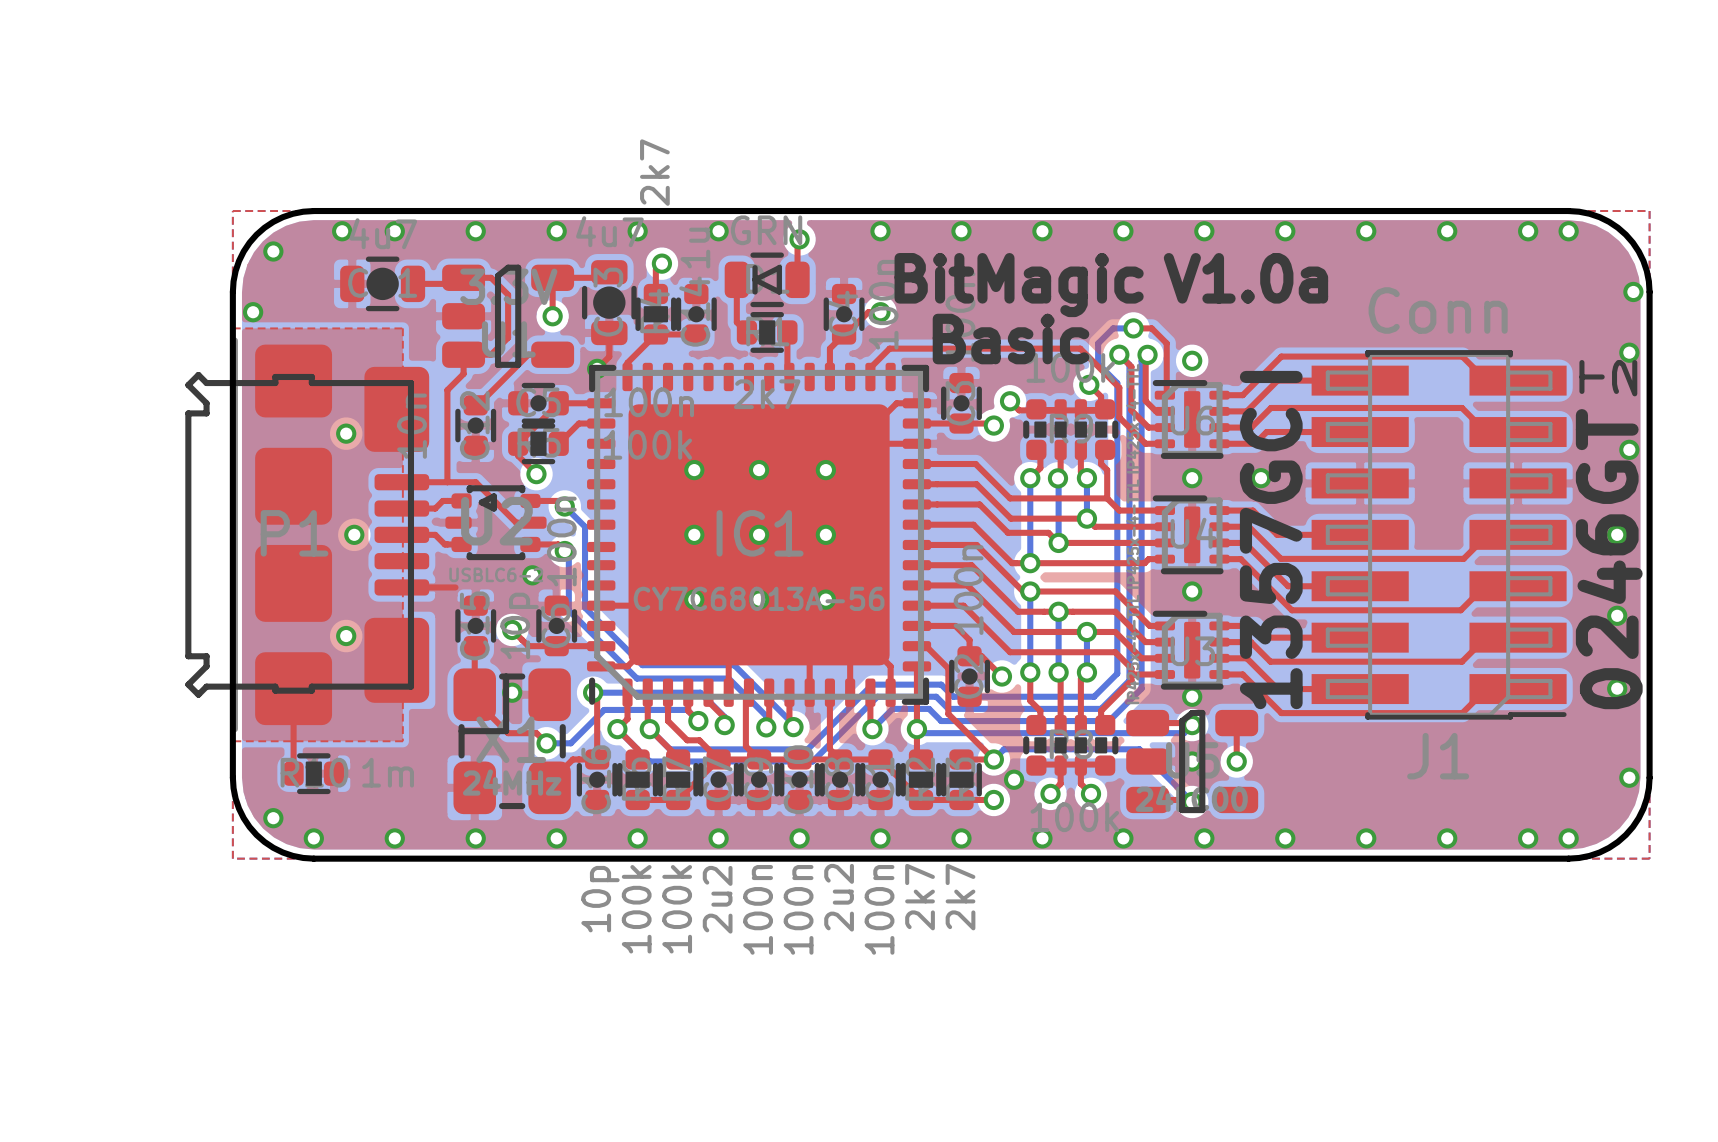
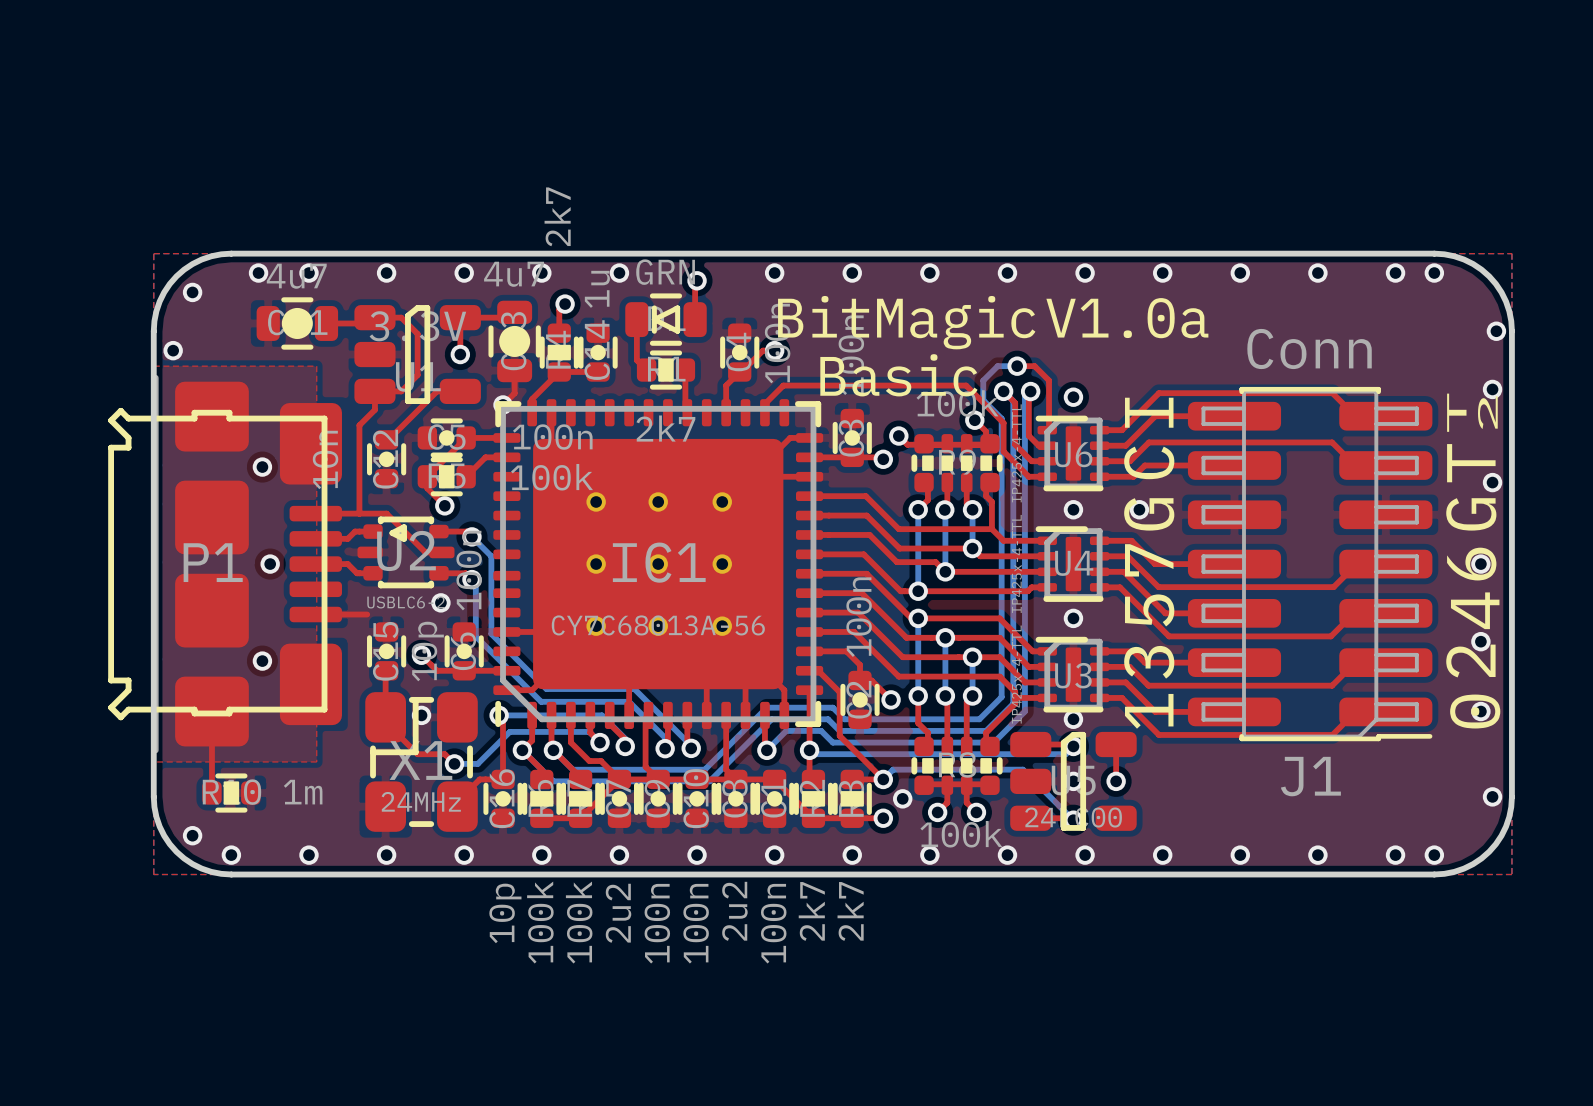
J1 footprint: [1311, 350, 1567, 720] -> [1187, 386, 1433, 742]

